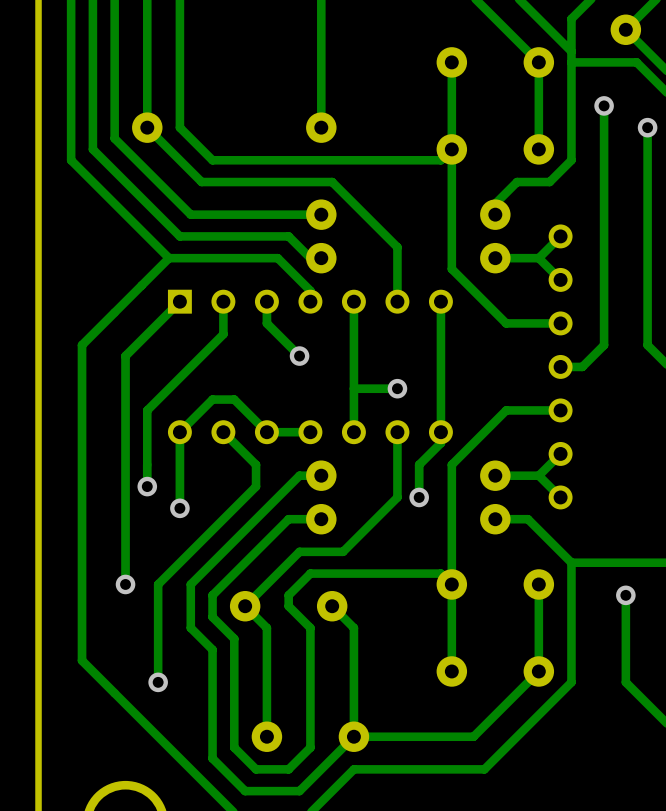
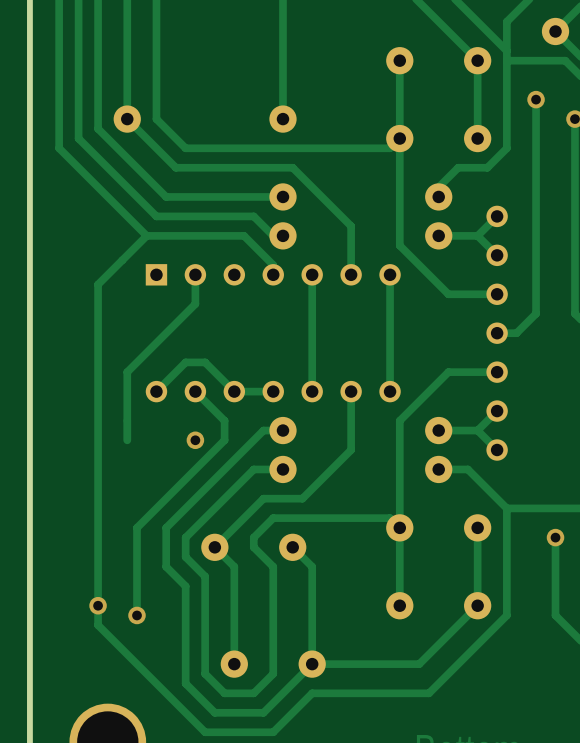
track: (179, 301) (125, 356) (125, 584) -> none
track: (266, 301) (266, 323) (299, 356) -> none
track: (114, 312) (82, 345) (82, 660) (114, 693) -> (98, 284) (98, 625)
via: (299, 356) -> none
track: (397, 388) (353, 388) -> none
via: (397, 388) -> none
track: (179, 432) (179, 508) -> none
track: (440, 432) (440, 443) (419, 464) (419, 497) -> none
via: (147, 486) -> none
via: none -> (195, 440)
via: (419, 497) -> none
via: (179, 508) -> none
via: (125, 584) -> none
via: none -> (98, 605)

